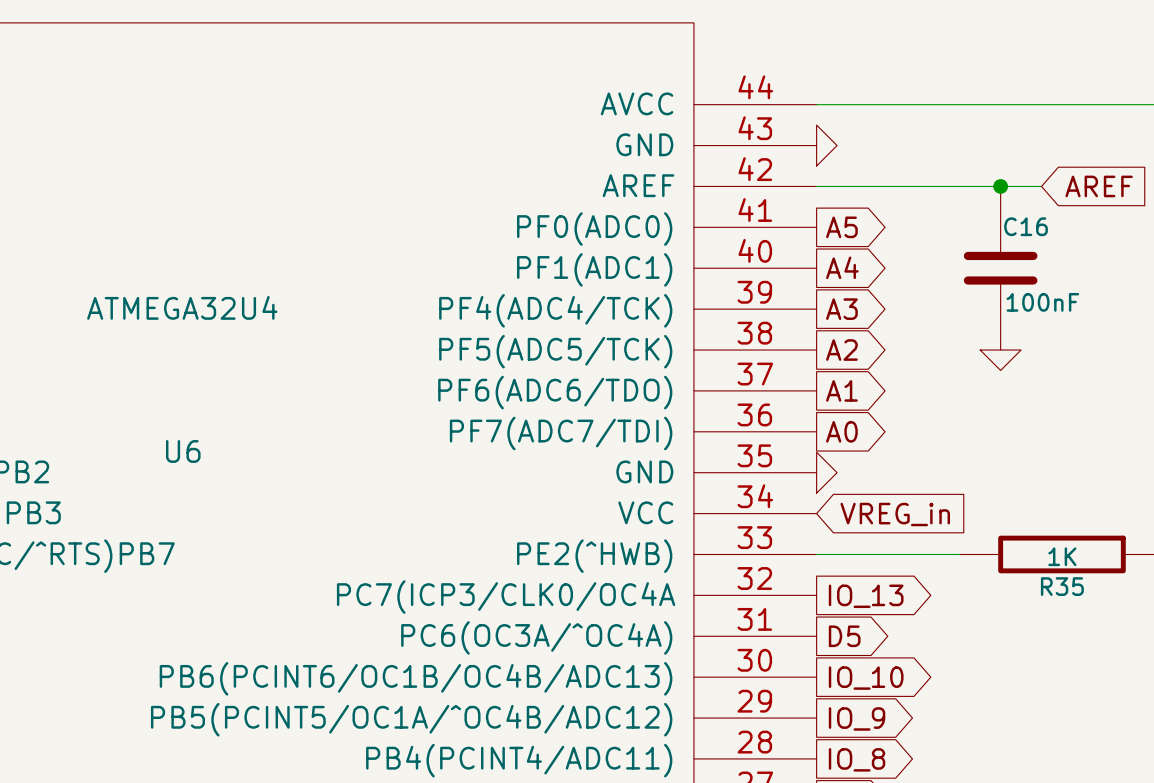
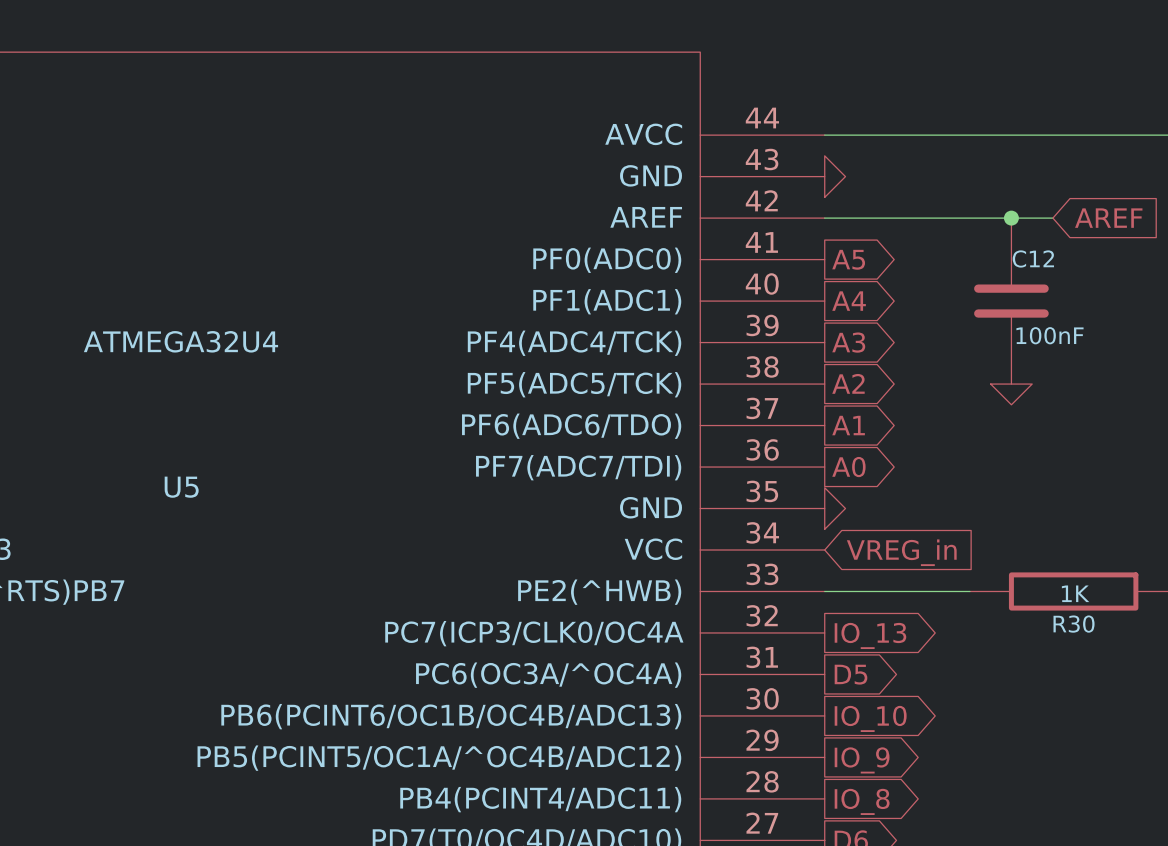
C16 name: C16 (1026, 226) -> C12 (1033, 258)
U6 name: U6 (183, 451) -> U5 (181, 487)
R35 name: R35 (1062, 586) -> R30 (1074, 624)

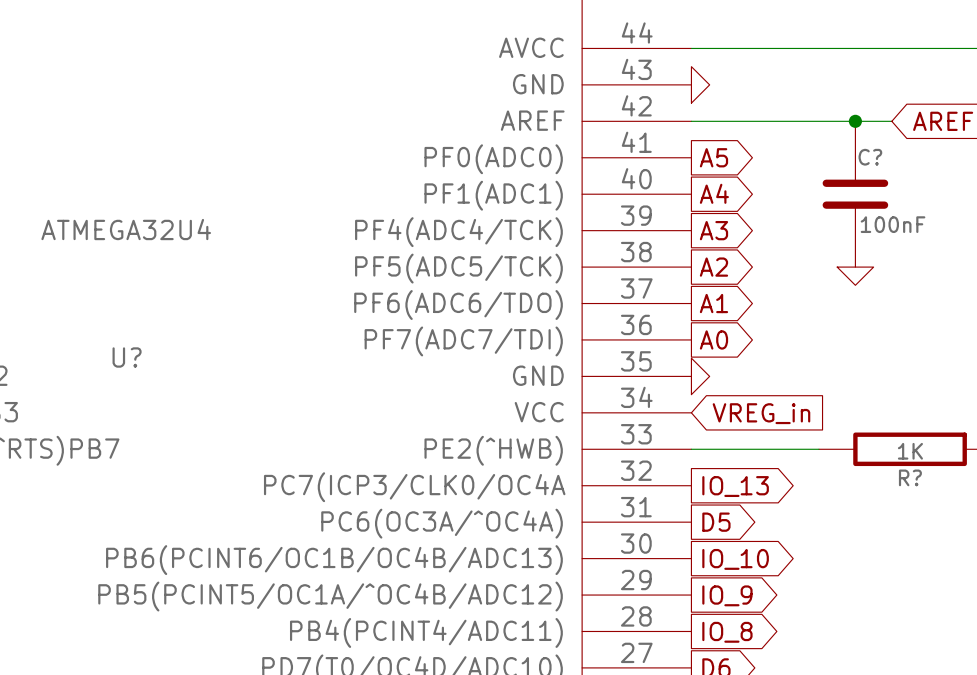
C12 name: C12 (1033, 258) -> C? (870, 157)
U5 name: U5 (181, 487) -> U? (127, 357)
R30 name: R30 (1074, 624) -> R? (910, 477)

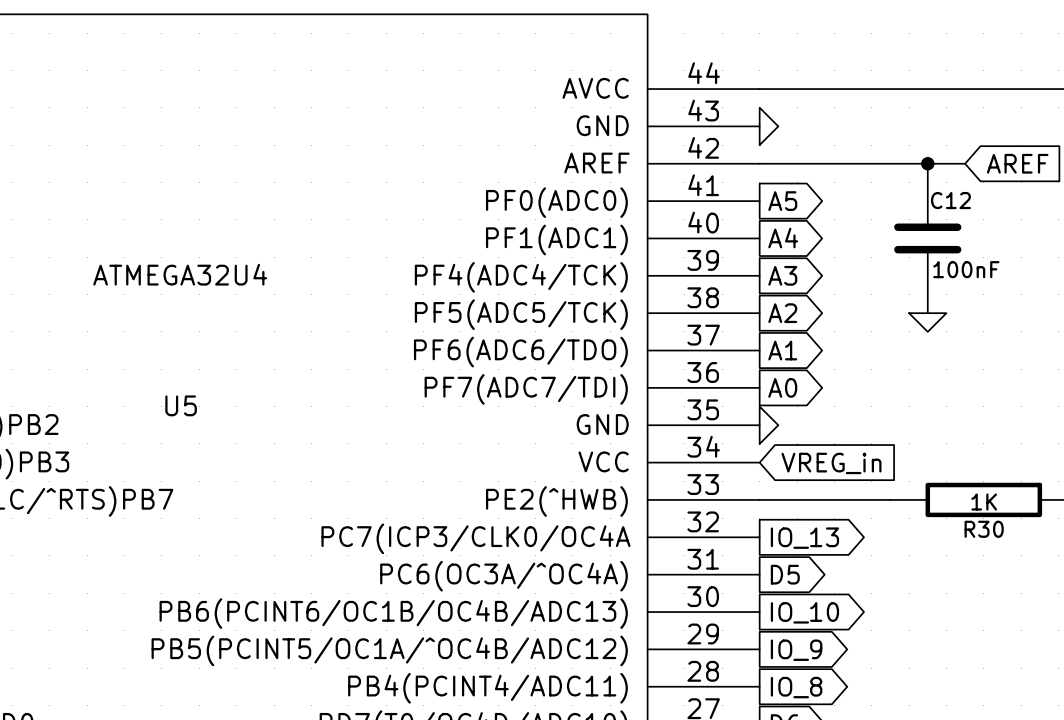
C? name: C? (870, 157) -> C12 (950, 200)
U? name: U? (127, 357) -> U5 (181, 405)
R? name: R? (910, 477) -> R30 (984, 529)

